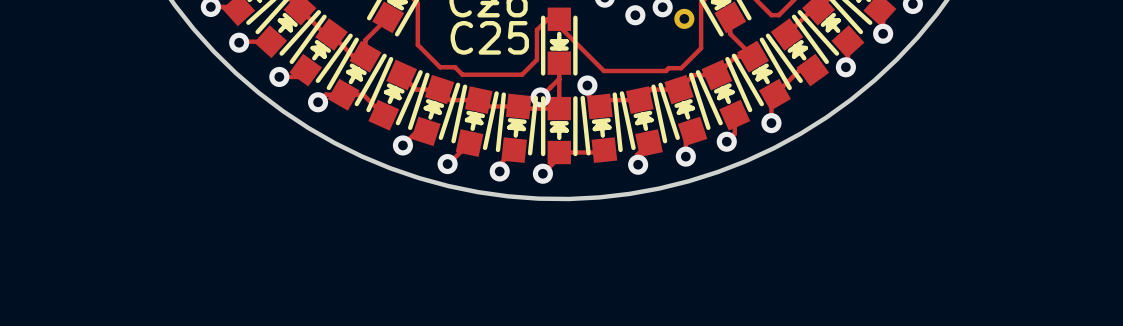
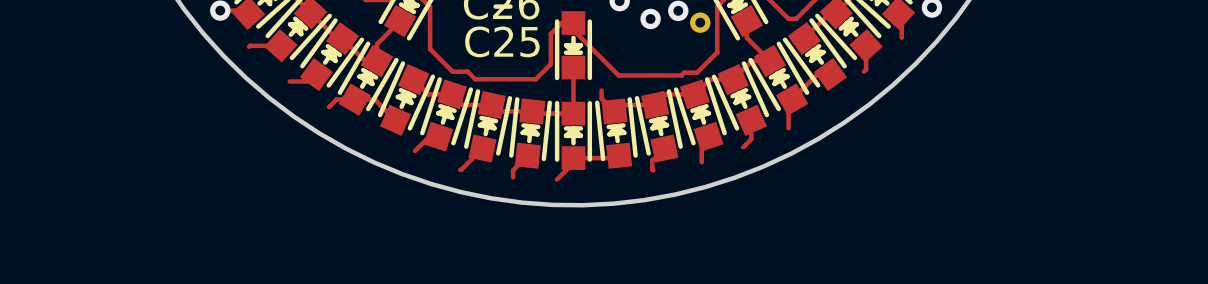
via: (883, 33) -> none
via: (239, 42) -> none
via: (845, 67) -> none
via: (279, 76) -> none
track: (558, 79) (540, 97) -> none
via: (587, 85) -> none
via: (540, 97) -> none
via: (318, 102) -> none
via: (771, 123) -> none
via: (726, 141) -> none
via: (402, 145) -> none
via: (685, 156) -> none
via: (447, 164) -> none
via: (638, 164) -> none
via: (499, 171) -> none
via: (542, 173) -> none

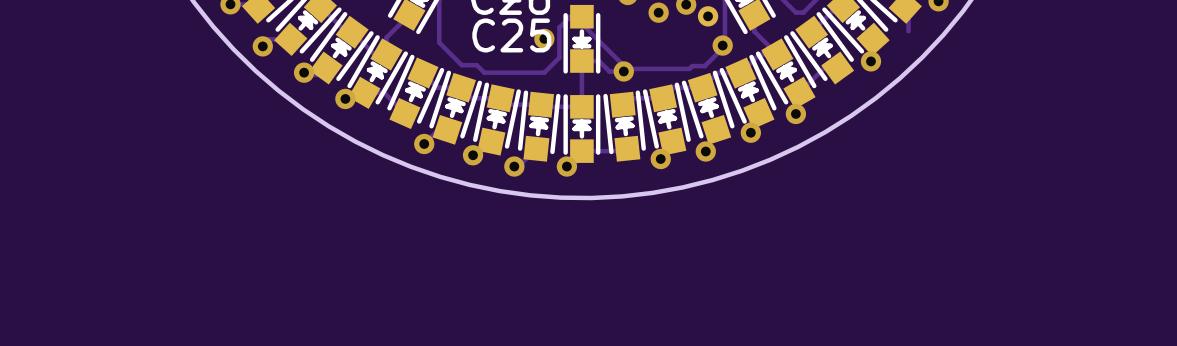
via: none -> (544, 38)
via: none -> (262, 46)
via: none -> (722, 45)
track: none -> (581, 61) (599, 61) (609, 71) (623, 71)
via: none -> (870, 61)
via: none -> (623, 71)
via: none -> (304, 72)
track: (601, 90) (601, 98) (614, 111) -> none
via: none -> (345, 98)
track: (751, 120) (751, 139) (743, 147) -> none
track: (788, 120) (788, 128) -> none
via: none -> (795, 113)
via: none -> (750, 132)
via: none -> (424, 144)
via: none -> (705, 151)
via: none -> (473, 155)
via: none -> (660, 159)
via: none -> (514, 166)
via: none -> (566, 166)

